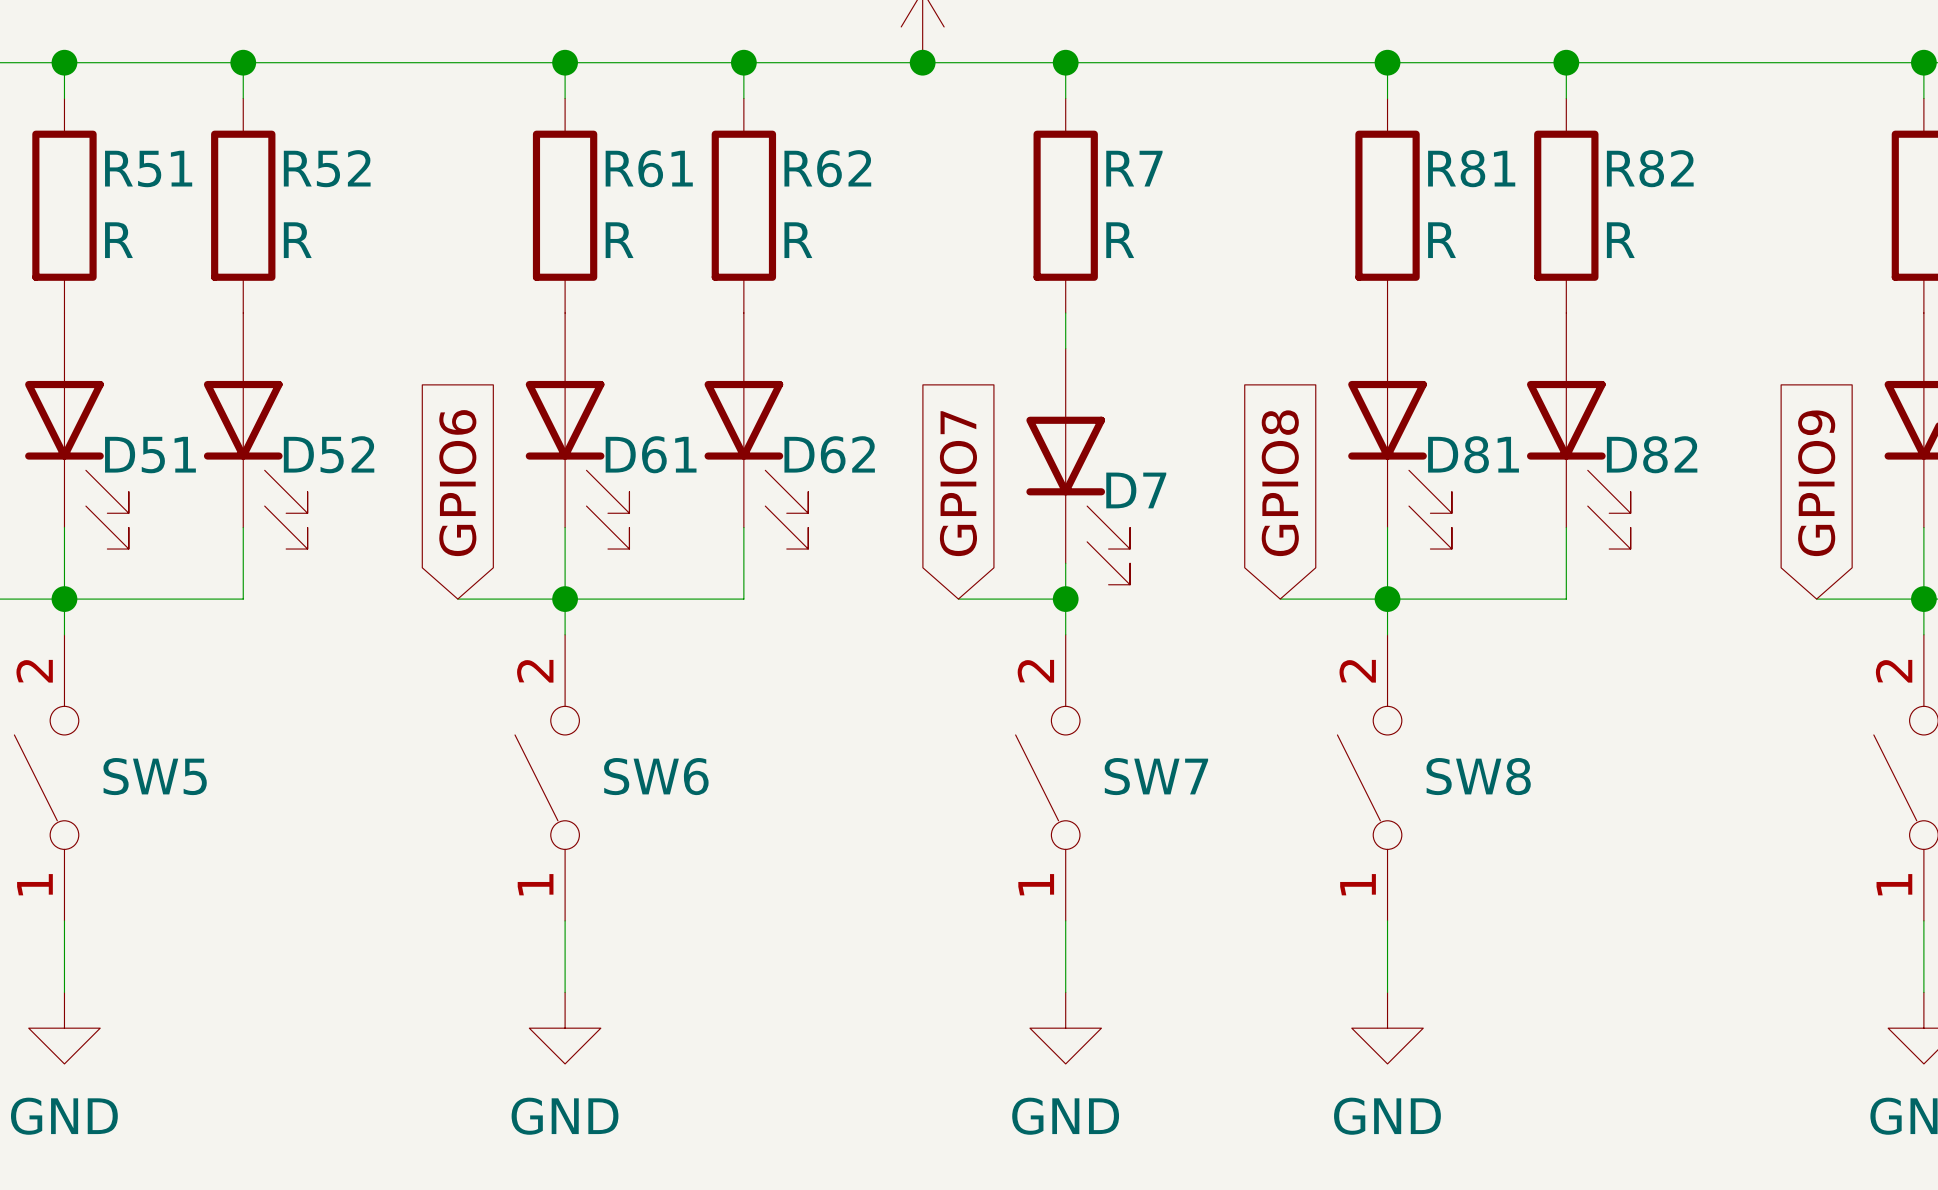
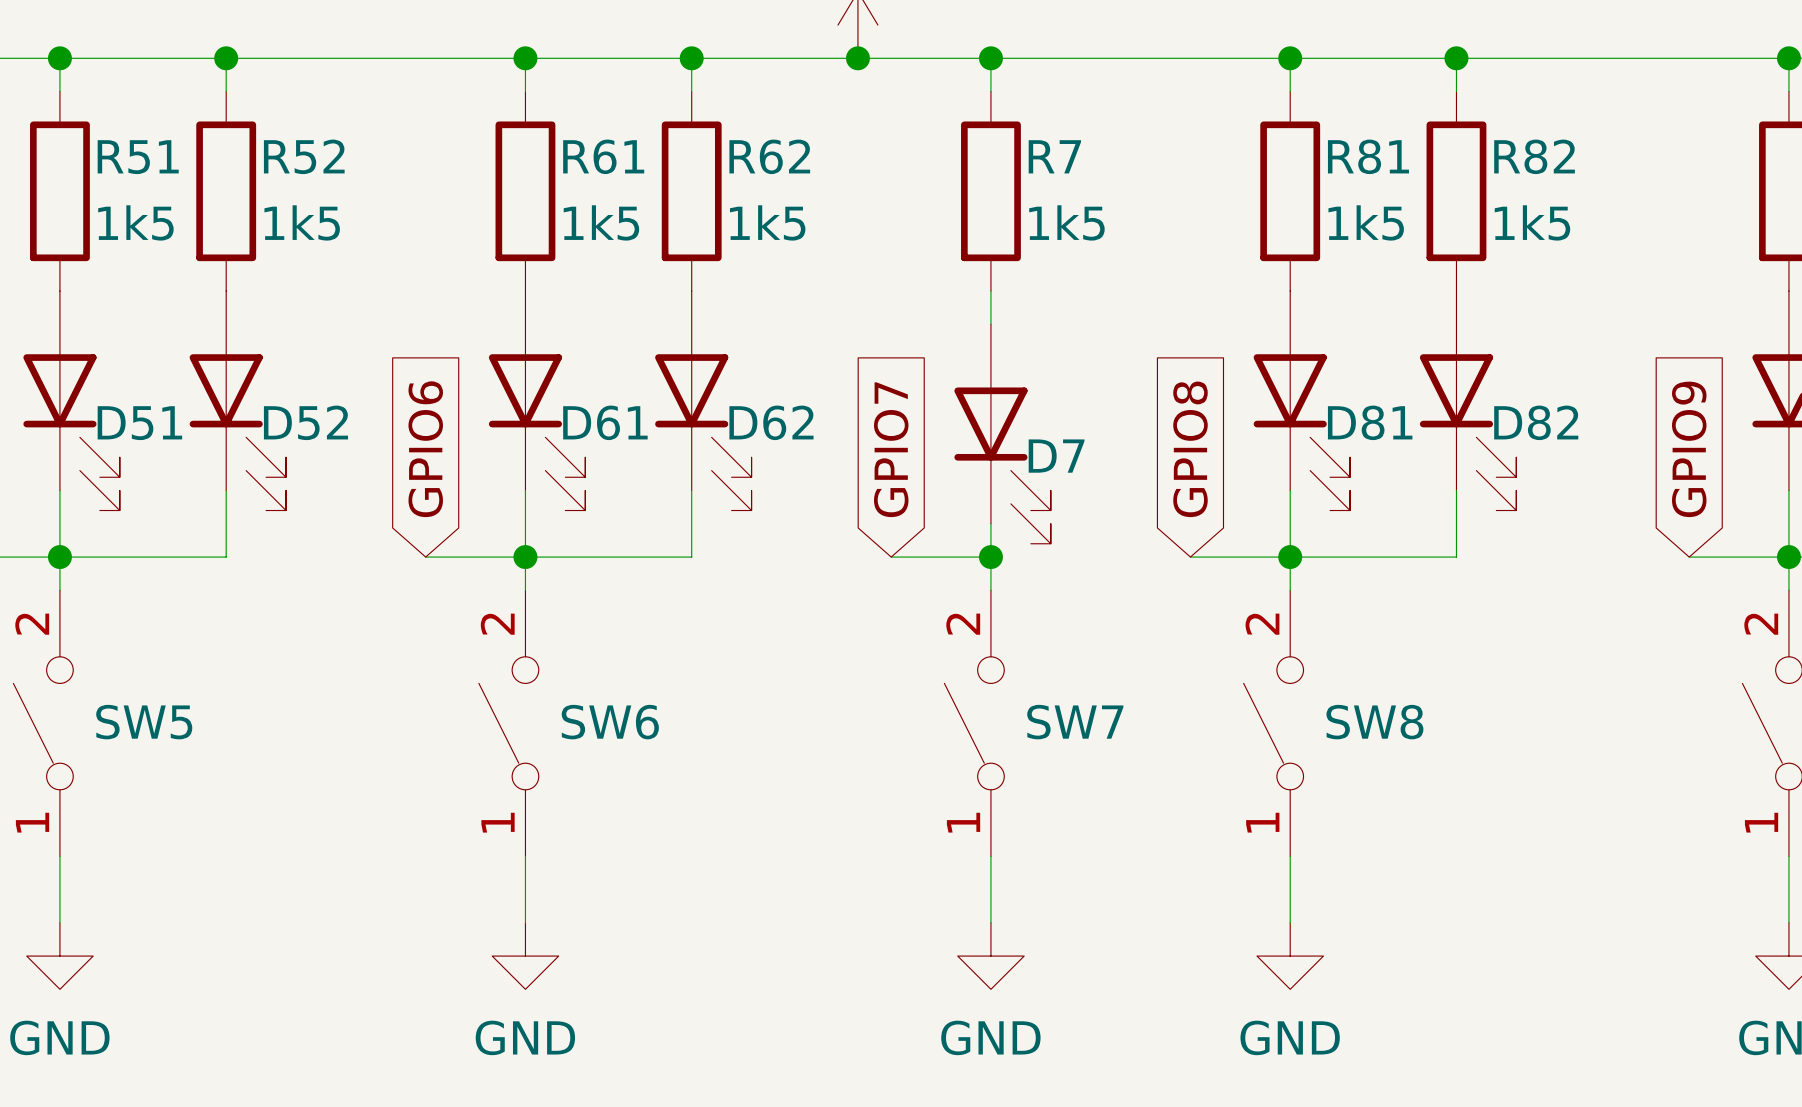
R51 value: R (118, 240) -> 1k5 (135, 222)
R52 value: R (297, 240) -> 1k5 (302, 222)
R61 value: R (619, 240) -> 1k5 (601, 222)
R62 value: R (798, 240) -> 1k5 (767, 222)
R7 value: R (1120, 240) -> 1k5 (1066, 222)
R81 value: R (1442, 240) -> 1k5 (1366, 222)
R82 value: R (1620, 240) -> 1k5 (1532, 222)

